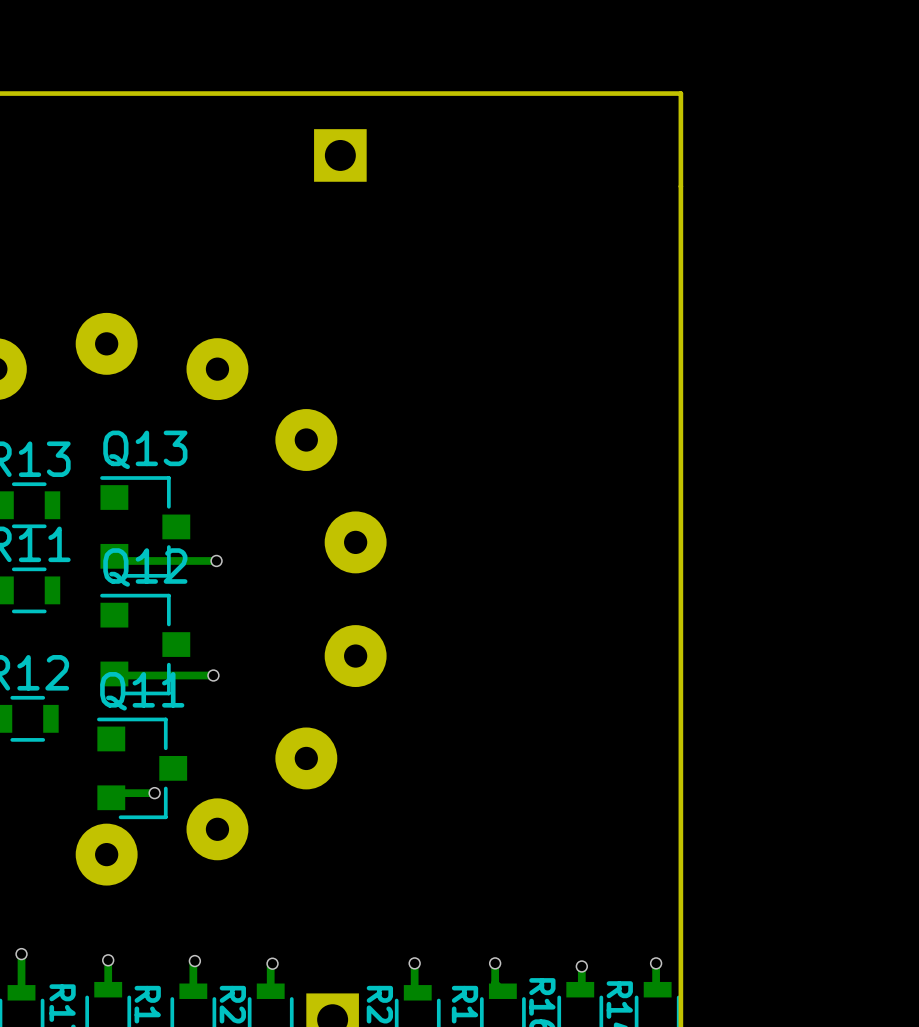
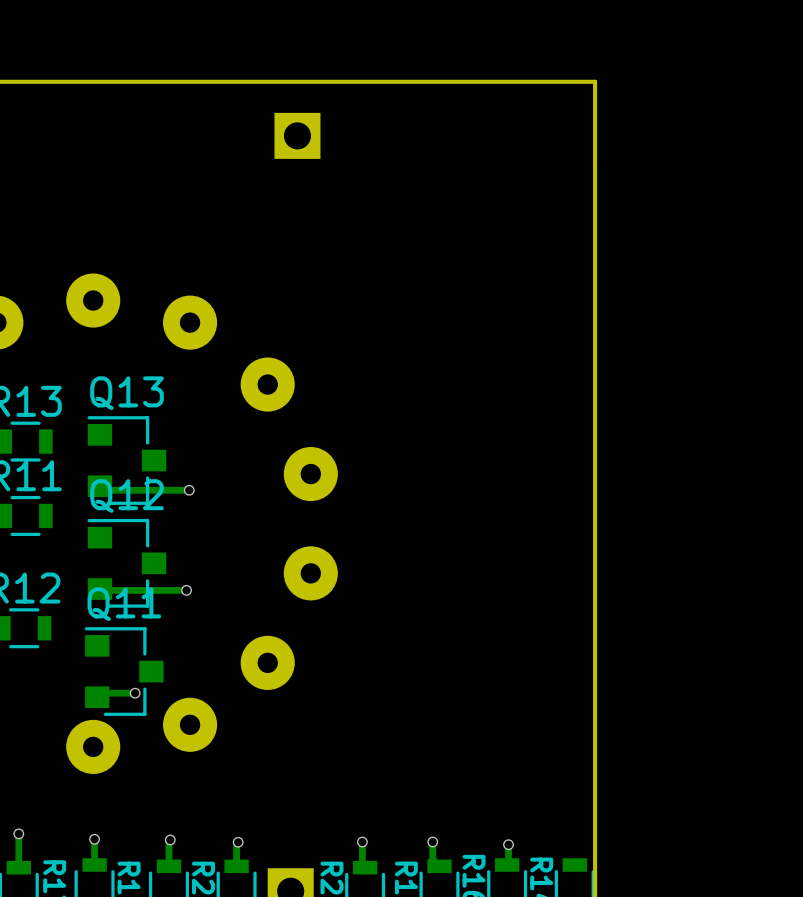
track: (656, 963) (657, 989) -> none
via: (656, 963) -> none

